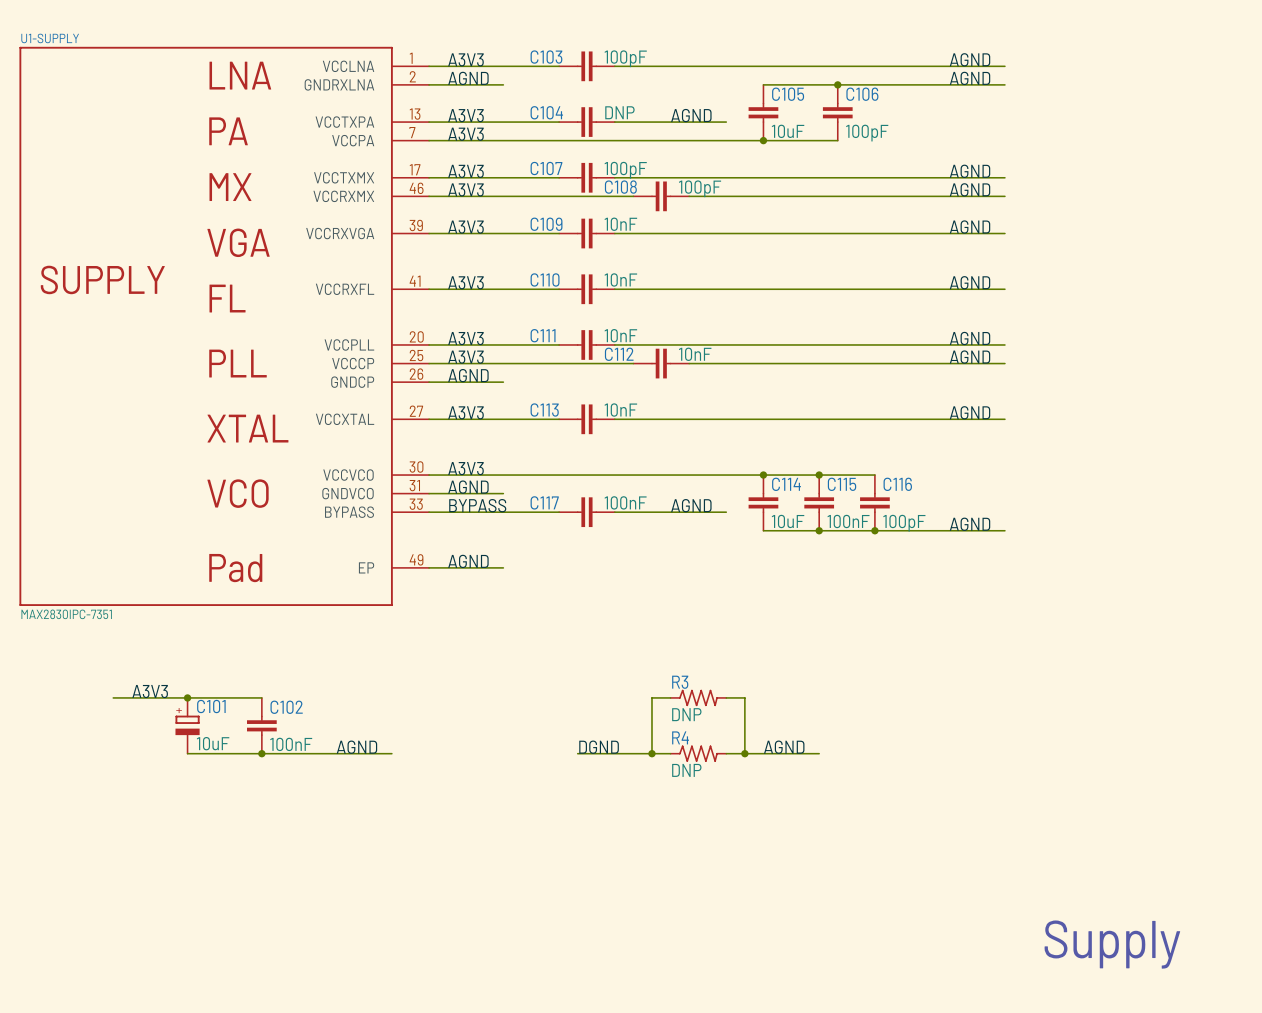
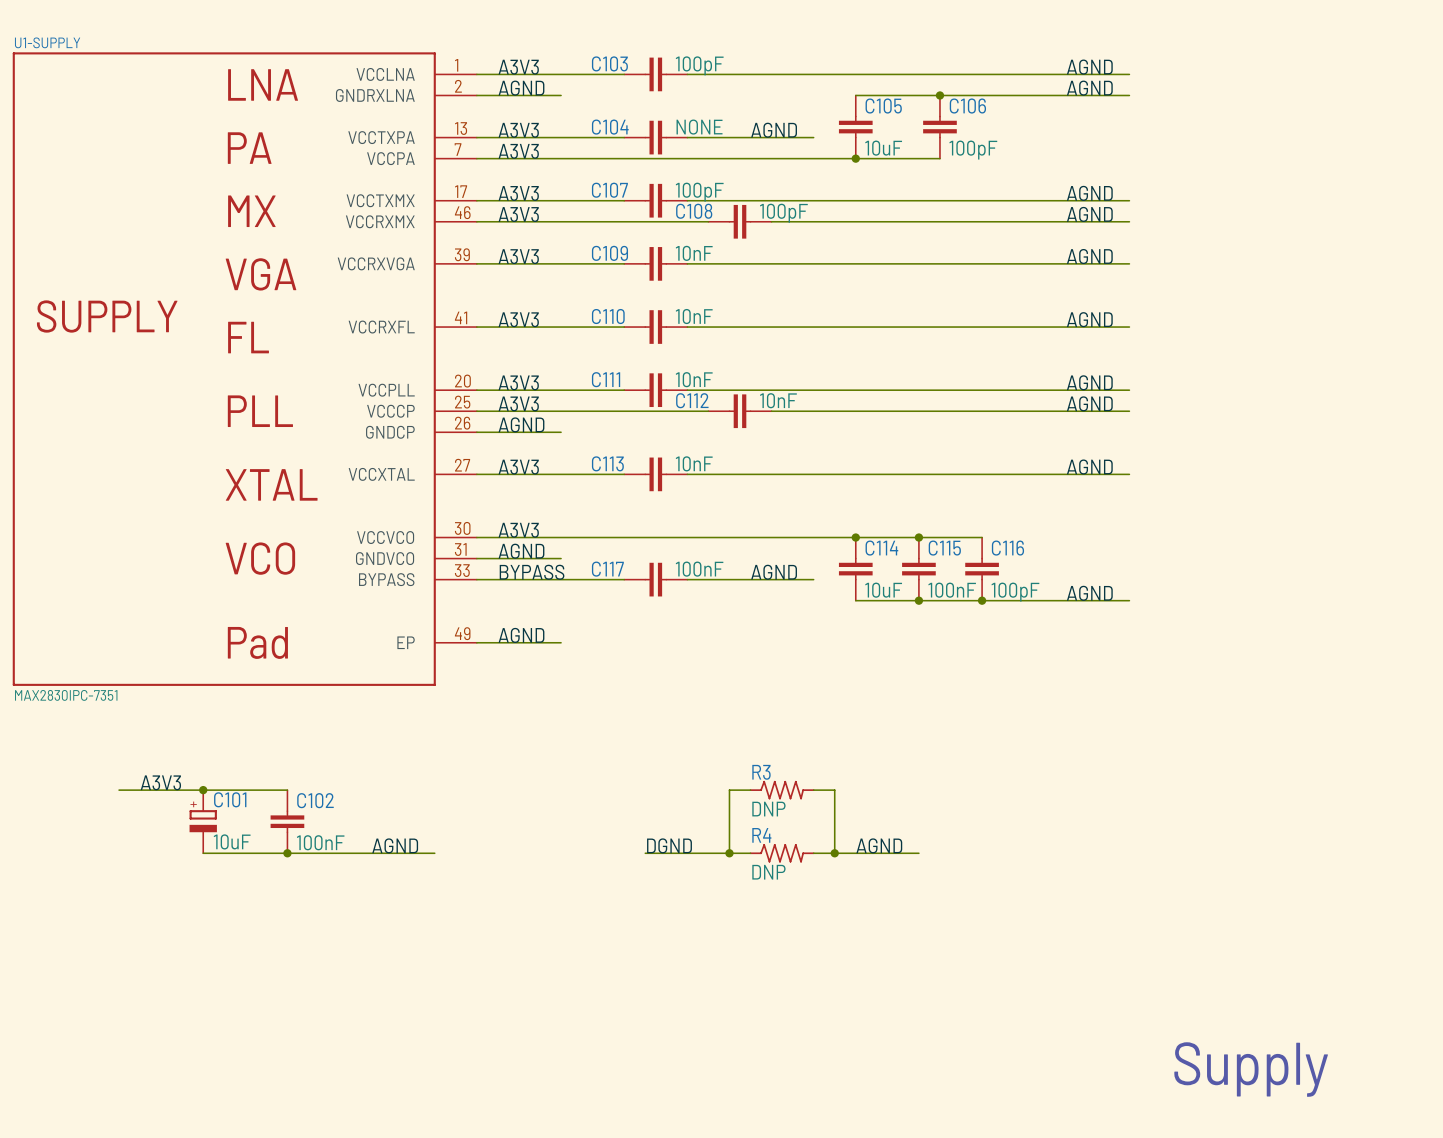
C104 value: DNP (619, 112) -> NONE (699, 127)

